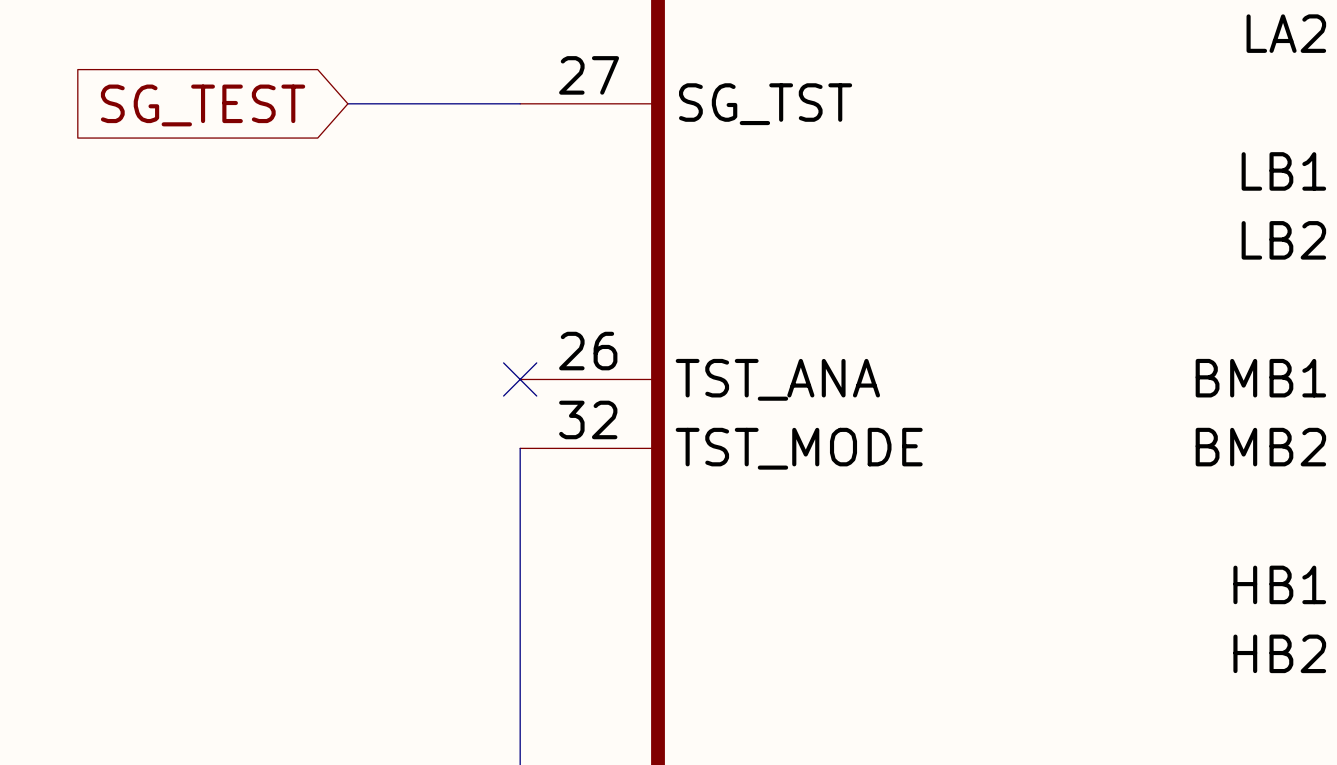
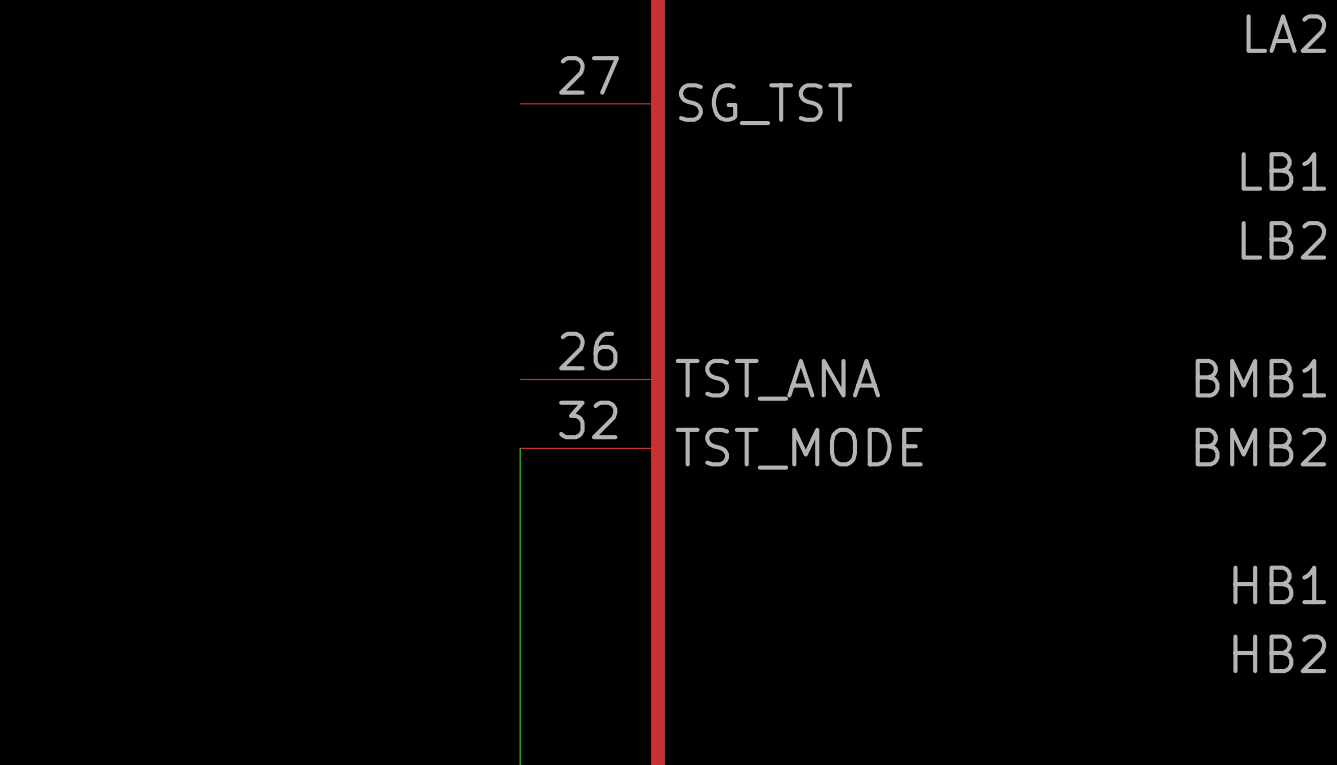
wire: (347, 103) (520, 103) -> none
global label: SG_TEST (203, 105) -> none
no-connect mark: (520, 379) -> none

